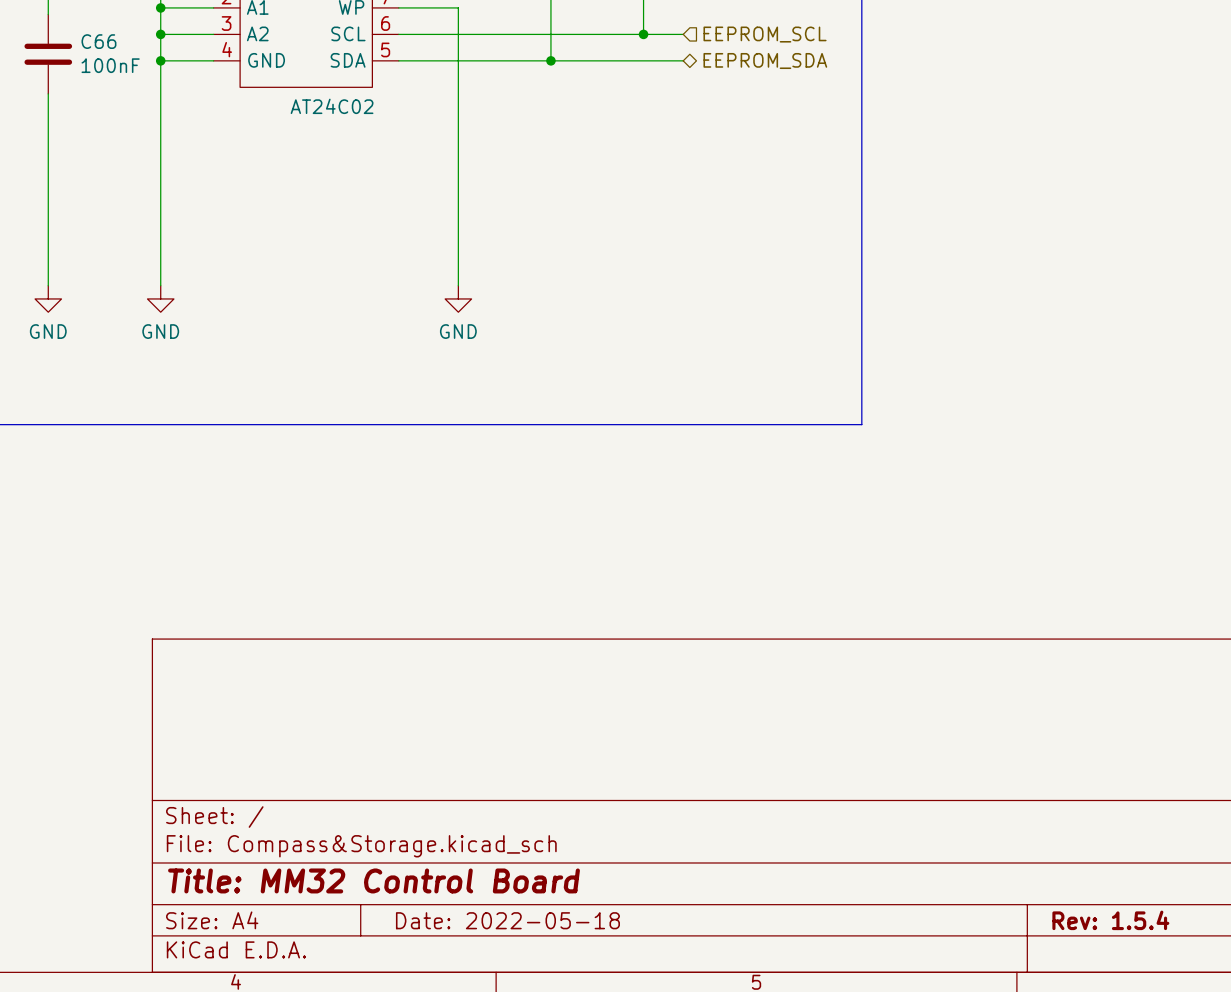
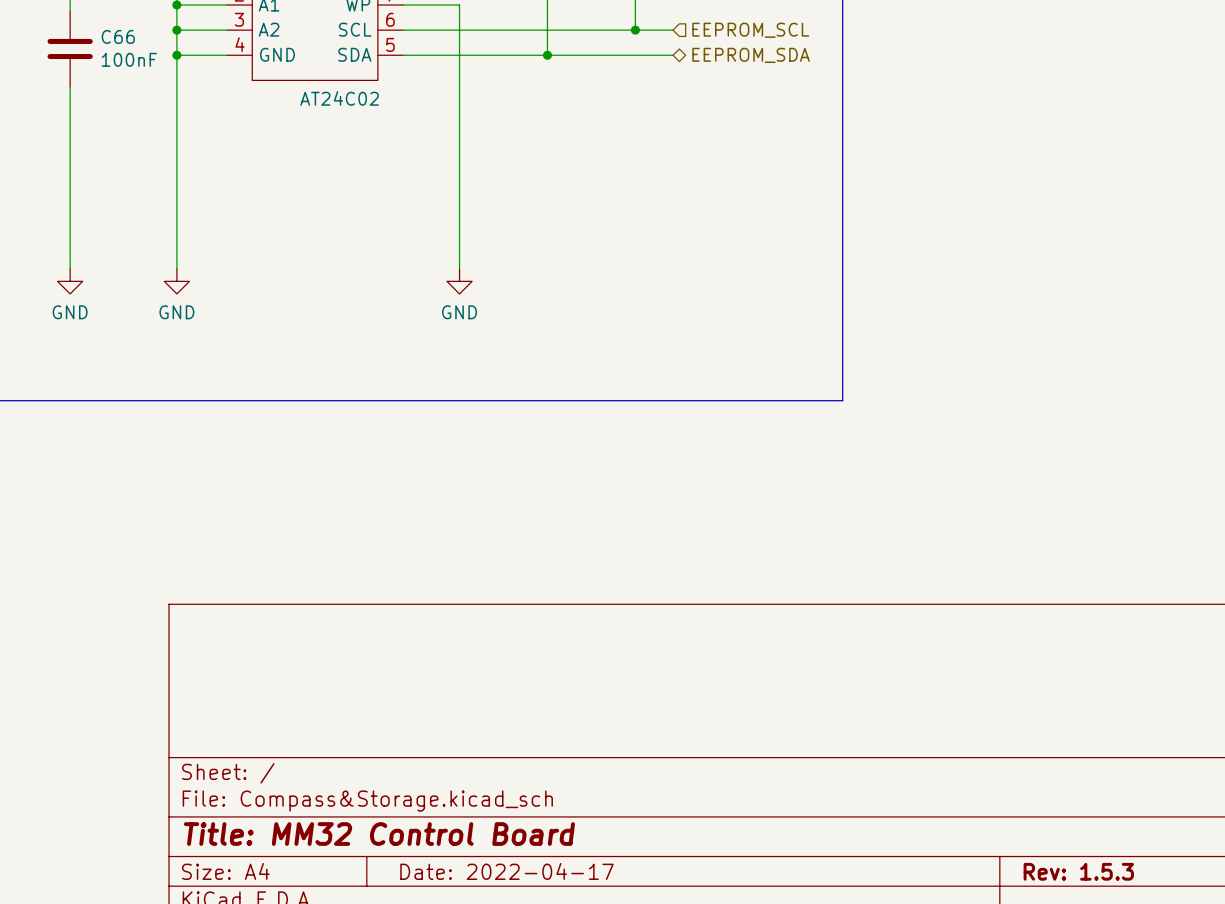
title block: Date: 2022-05-18 (507, 920) -> Date: 2022-04-17 (506, 871)
title block: Rev: 1.5.4 (1110, 920) -> Rev: 1.5.3 (1078, 871)

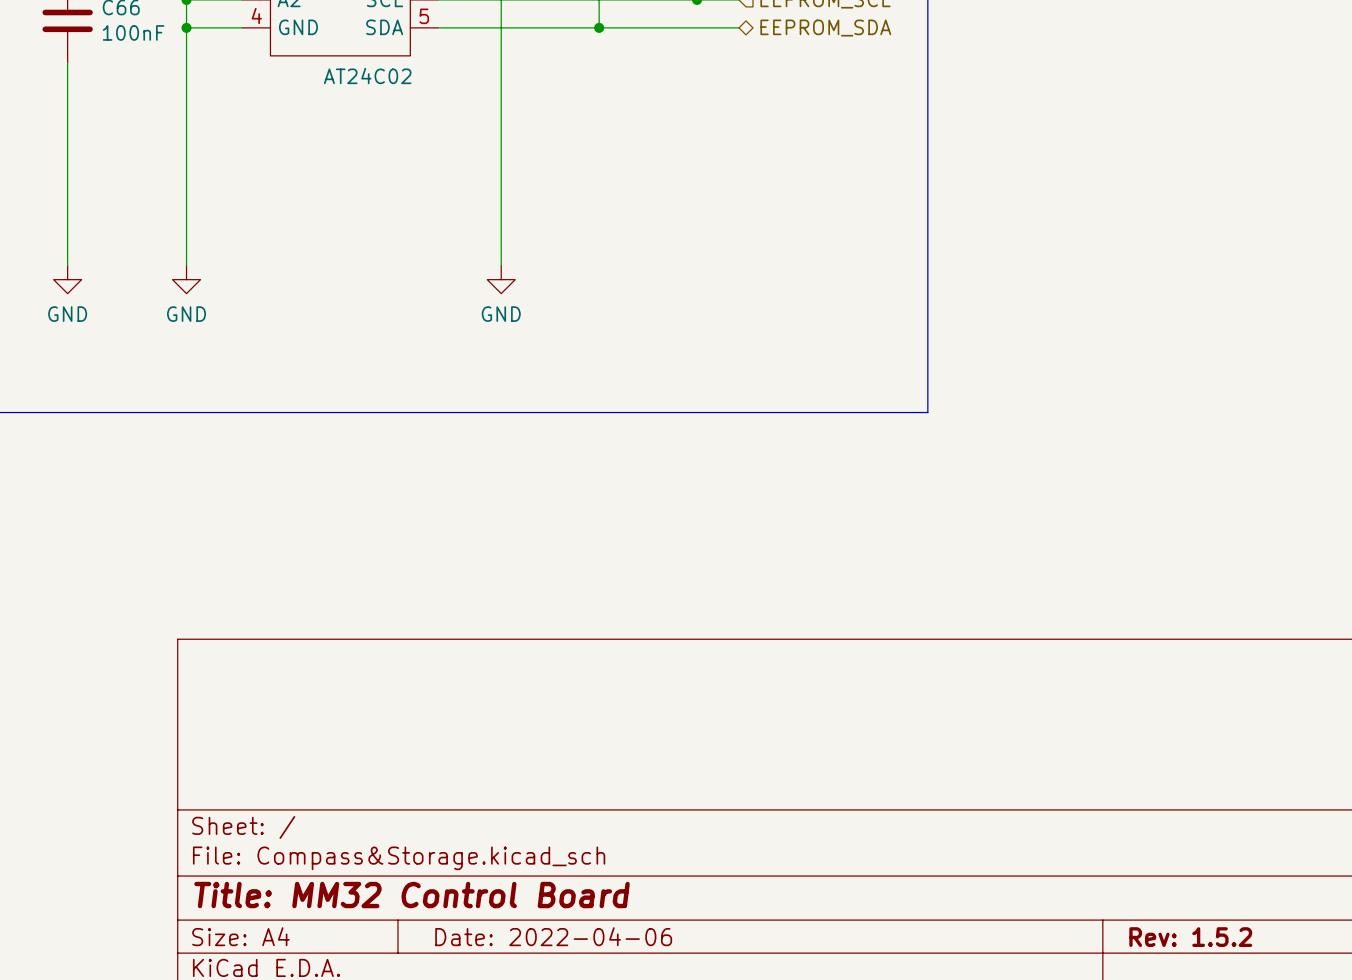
title block: Date: 2022-04-17 (506, 871) -> Date: 2022-04-06 (553, 936)
title block: Rev: 1.5.3 (1078, 871) -> Rev: 1.5.2 (1190, 937)

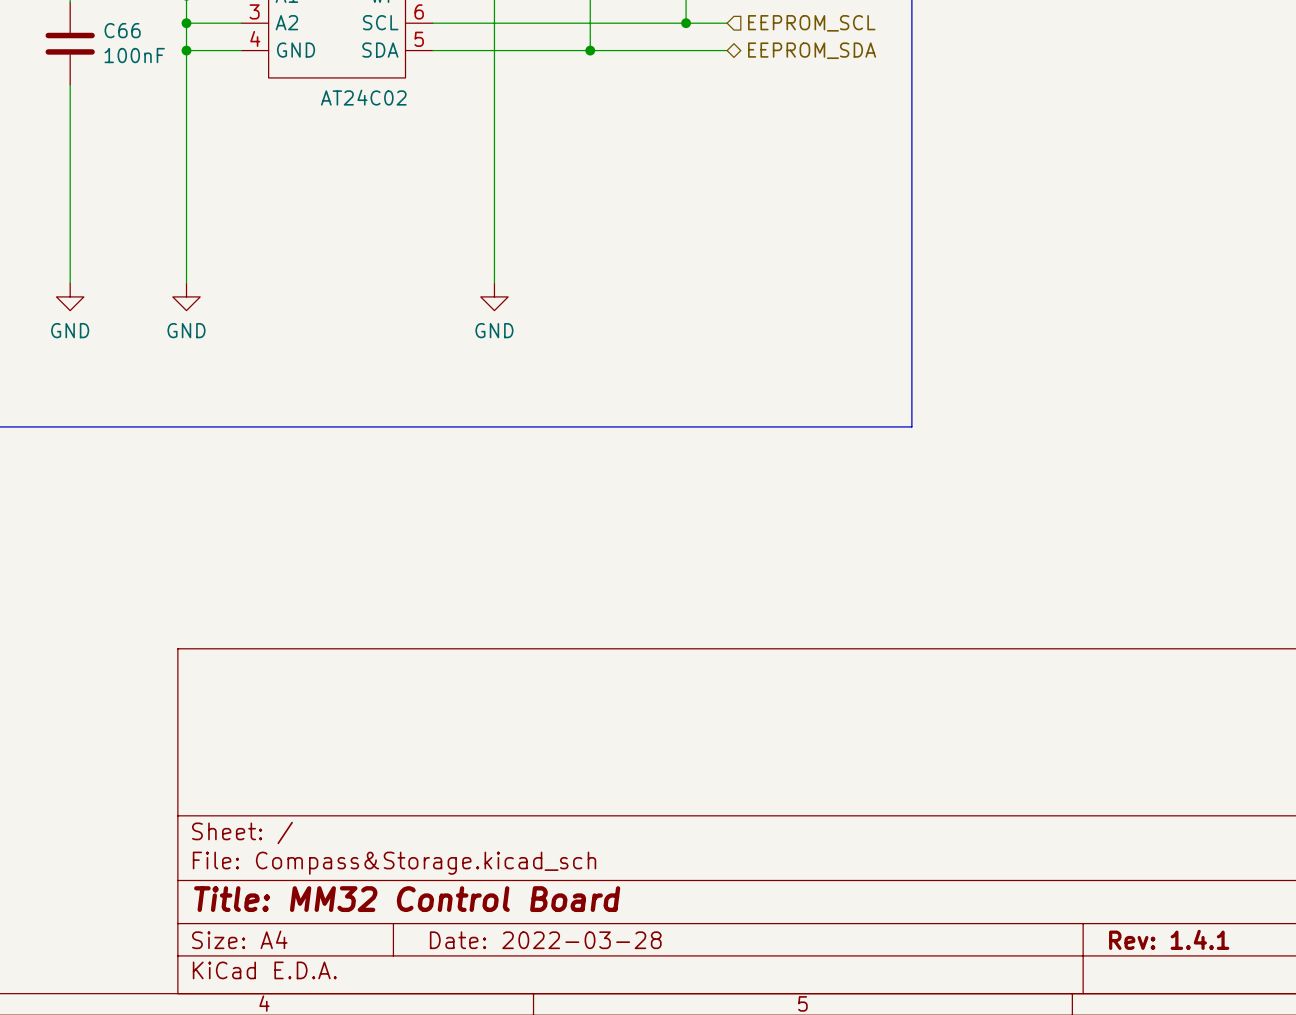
title block: Date: 2022-04-06 (553, 936) -> Date: 2022-03-28 (545, 940)
title block: Rev: 1.5.2 (1190, 937) -> Rev: 1.4.1 (1169, 939)

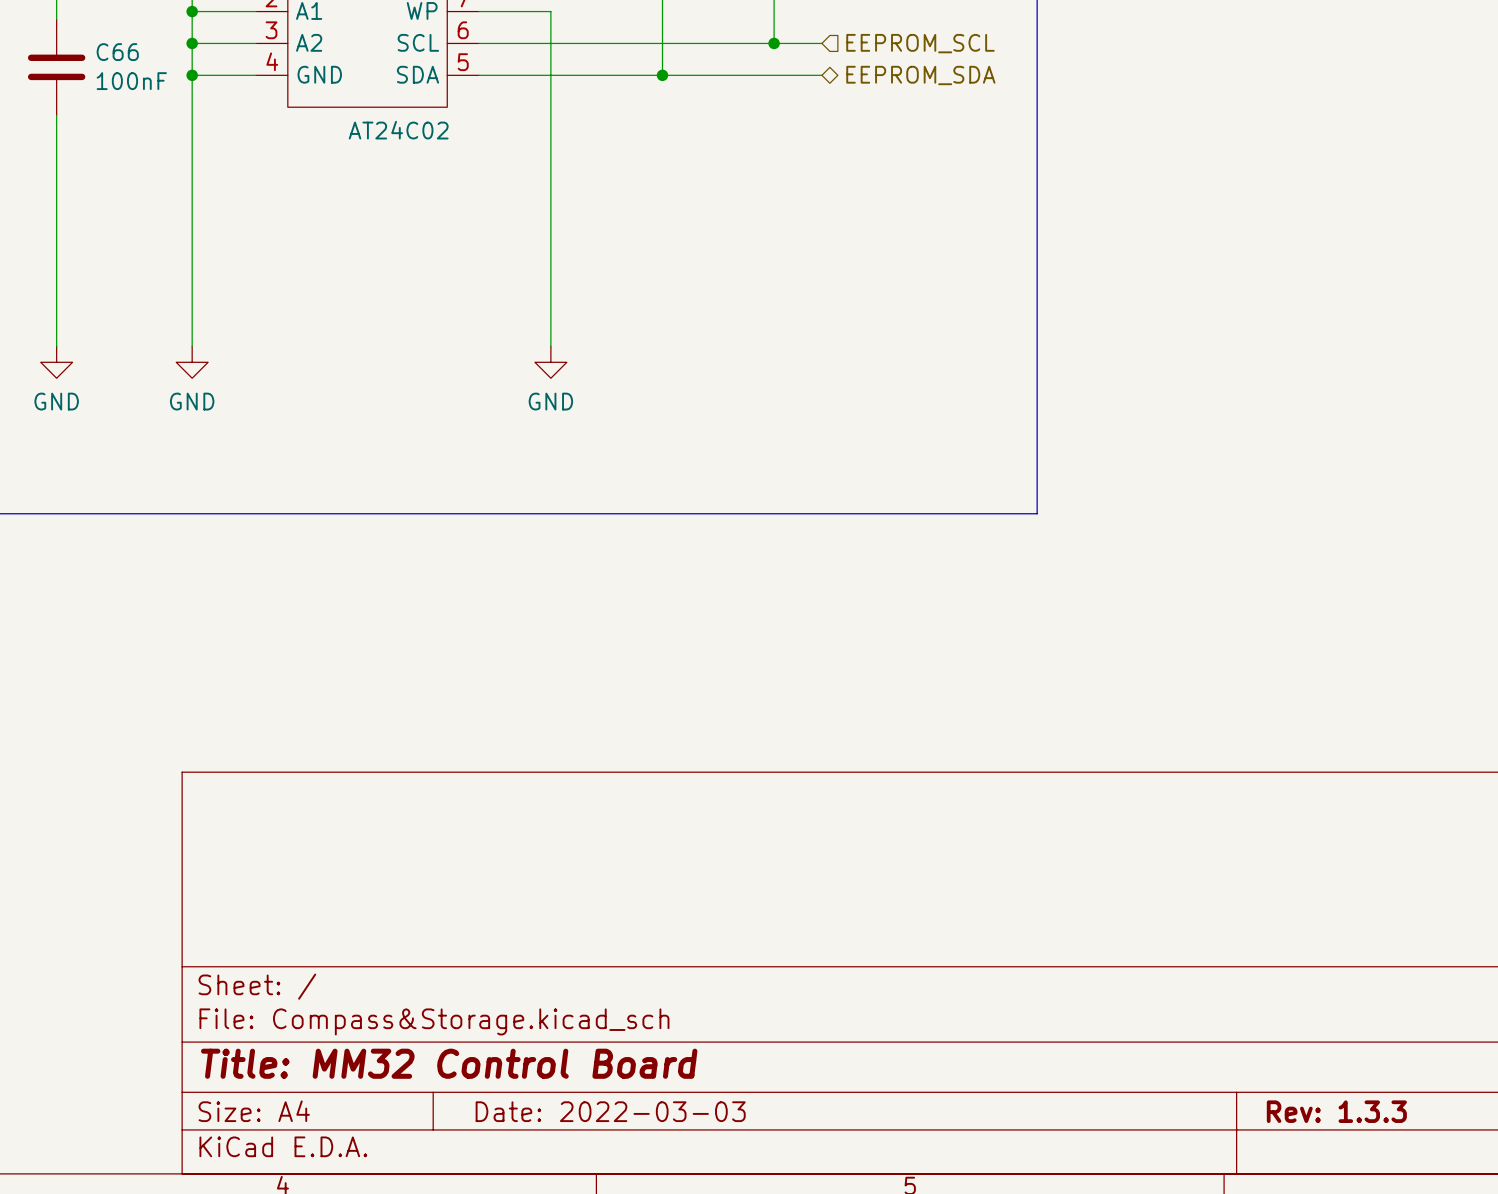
title block: Rev: 1.4.1 (1169, 939) -> Rev: 1.3.3 (1336, 1111)
title block: Date: 2022-03-28 (545, 940) -> Date: 2022-03-03 (610, 1111)

